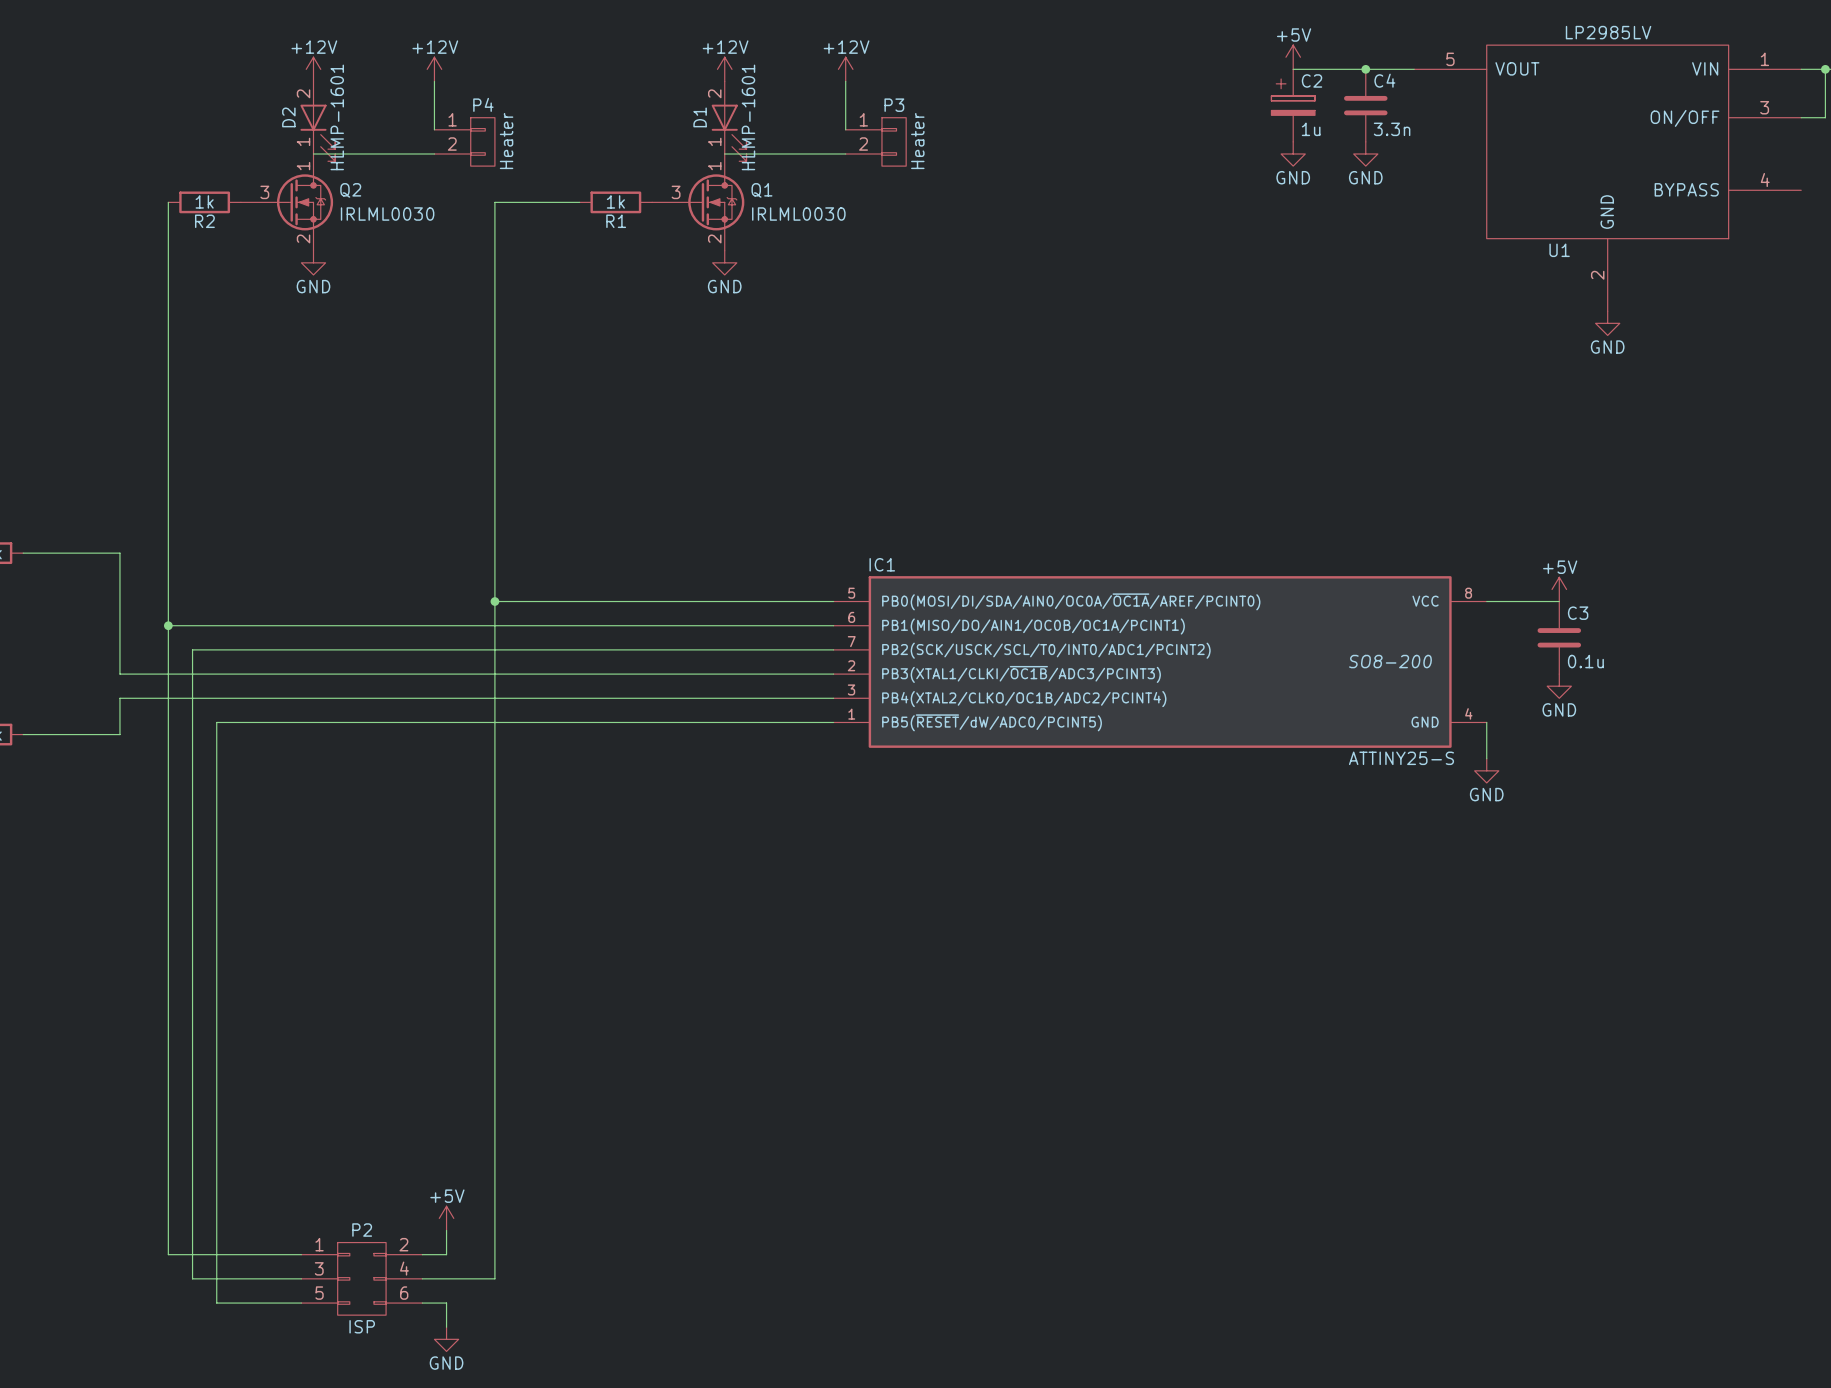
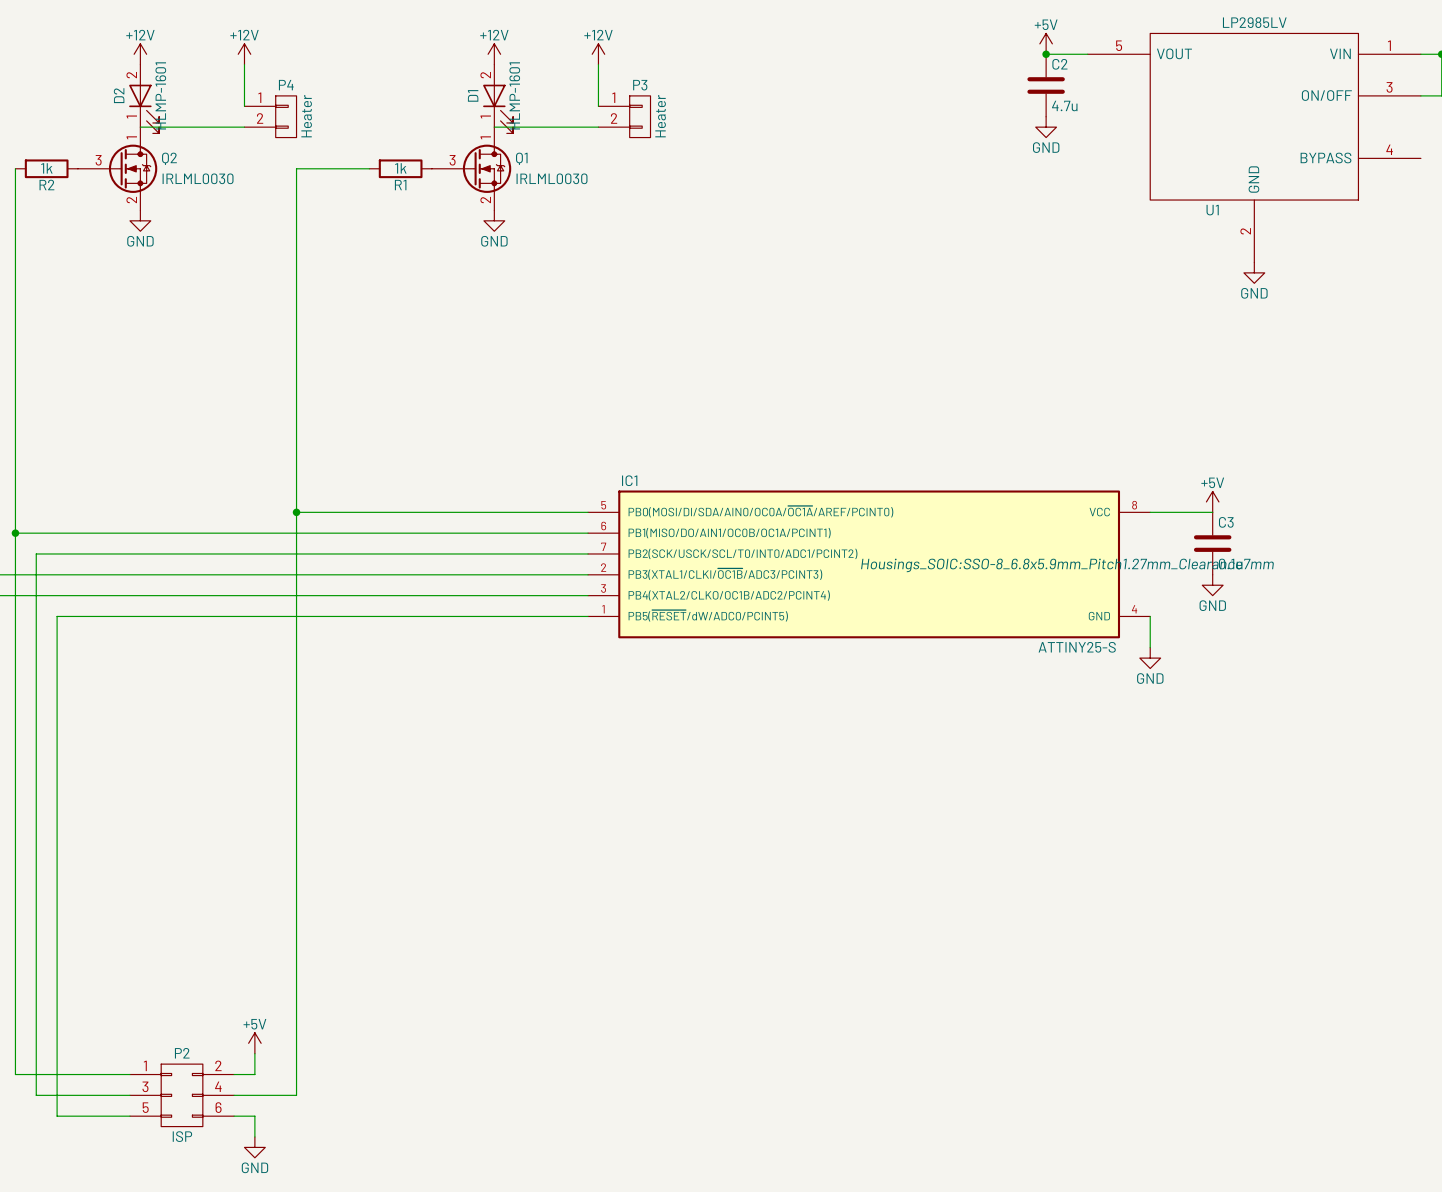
power symbol position: +5V (1293, 57) -> +5V (1046, 43)
wire: (1293, 69) (1365, 69) -> none
C4 name: C4 (1384, 80) -> C2 (1059, 64)
C2: 1u (1293, 105) -> none
C4 value: 3.3n (1392, 129) -> 4.7u (1064, 105)
power symbol: GND (1293, 154) -> none
IC1 text: SO8-200 (1390, 661) -> Housings_SOIC:SSO-8_6.8x5.9mm_Pitch1.27mm_Clearance7mm (1067, 565)

